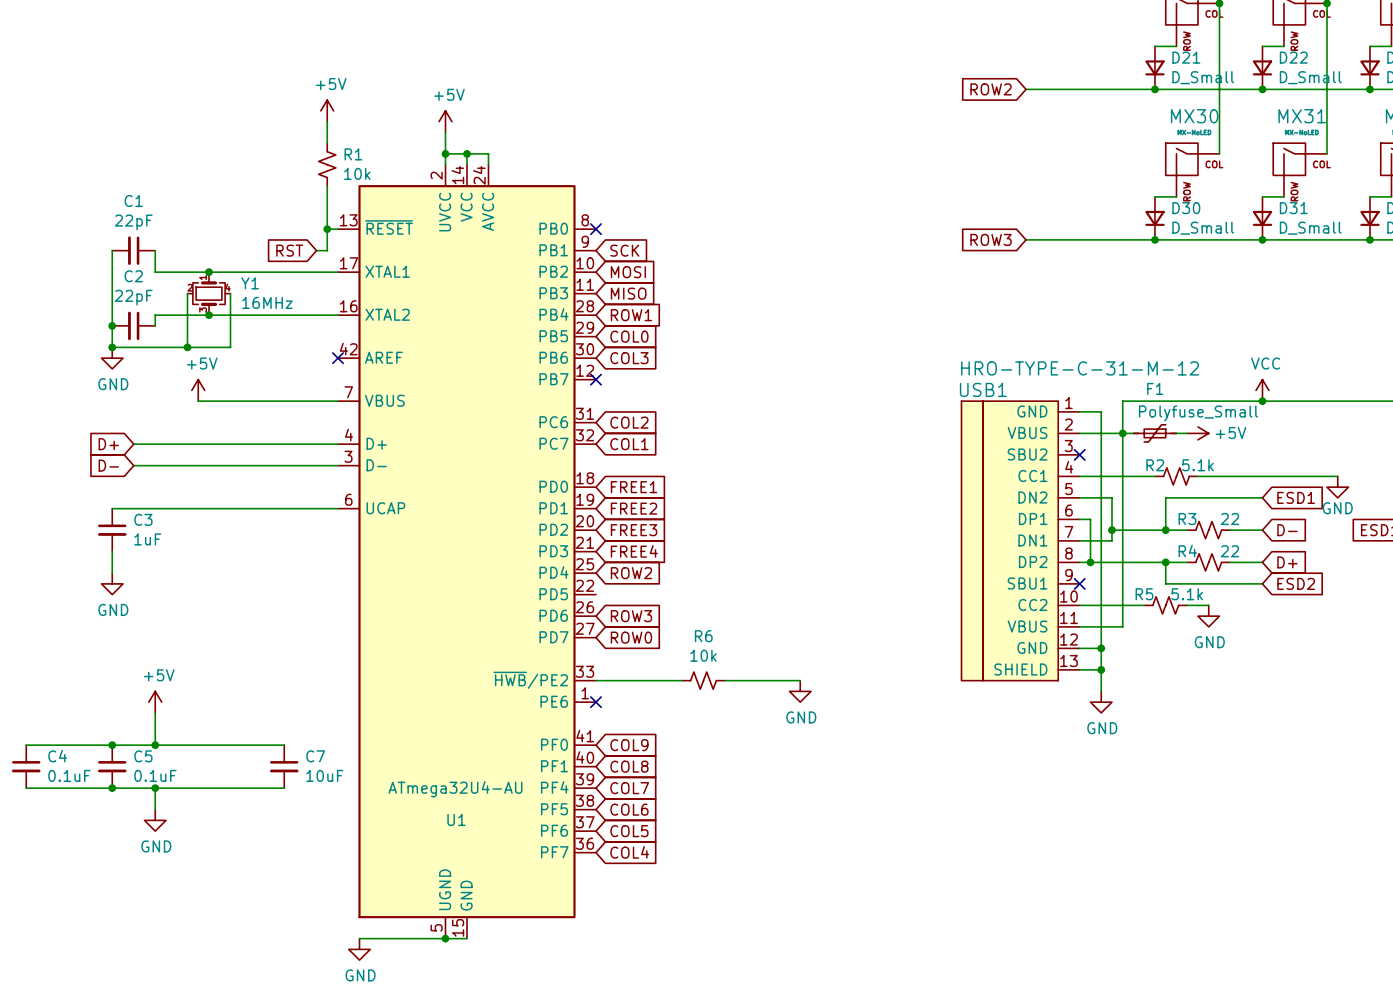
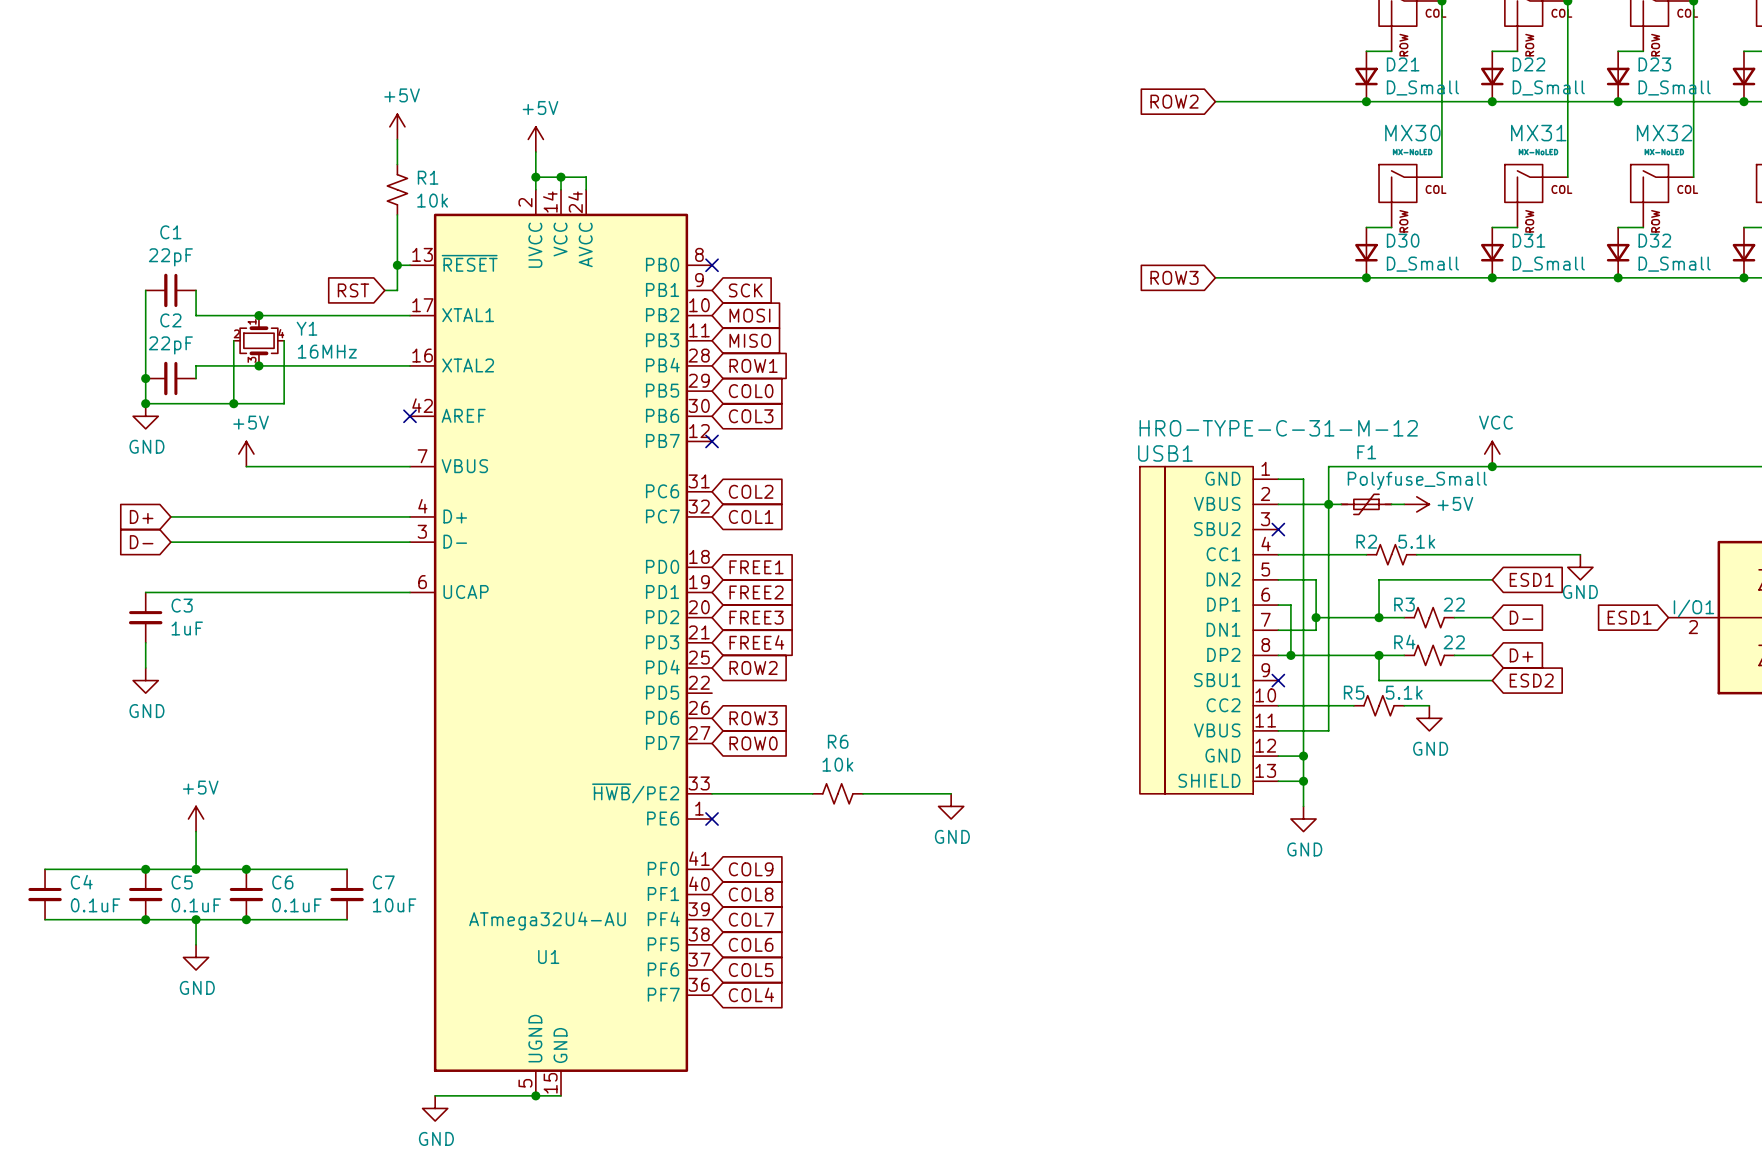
junction: none -> (246, 869)
C6: none -> 0.1uF (246, 894)
junction: none -> (246, 919)

